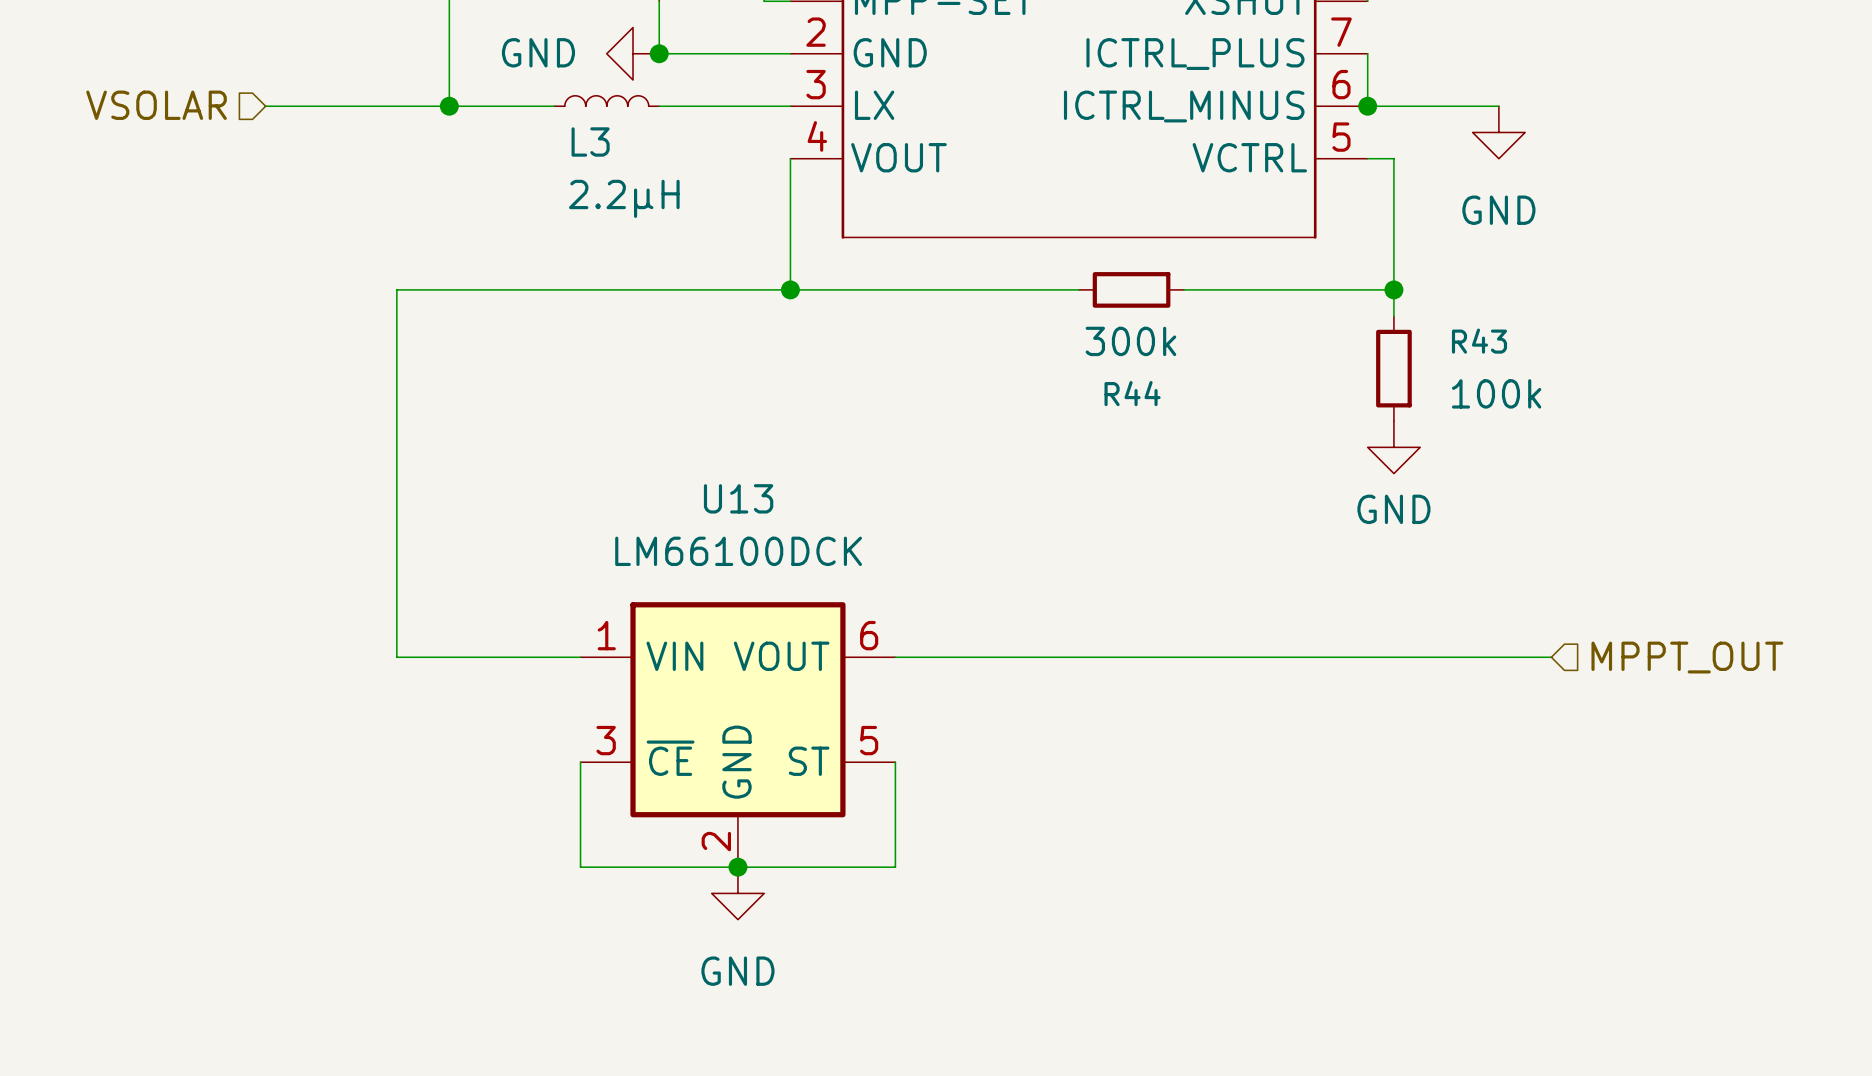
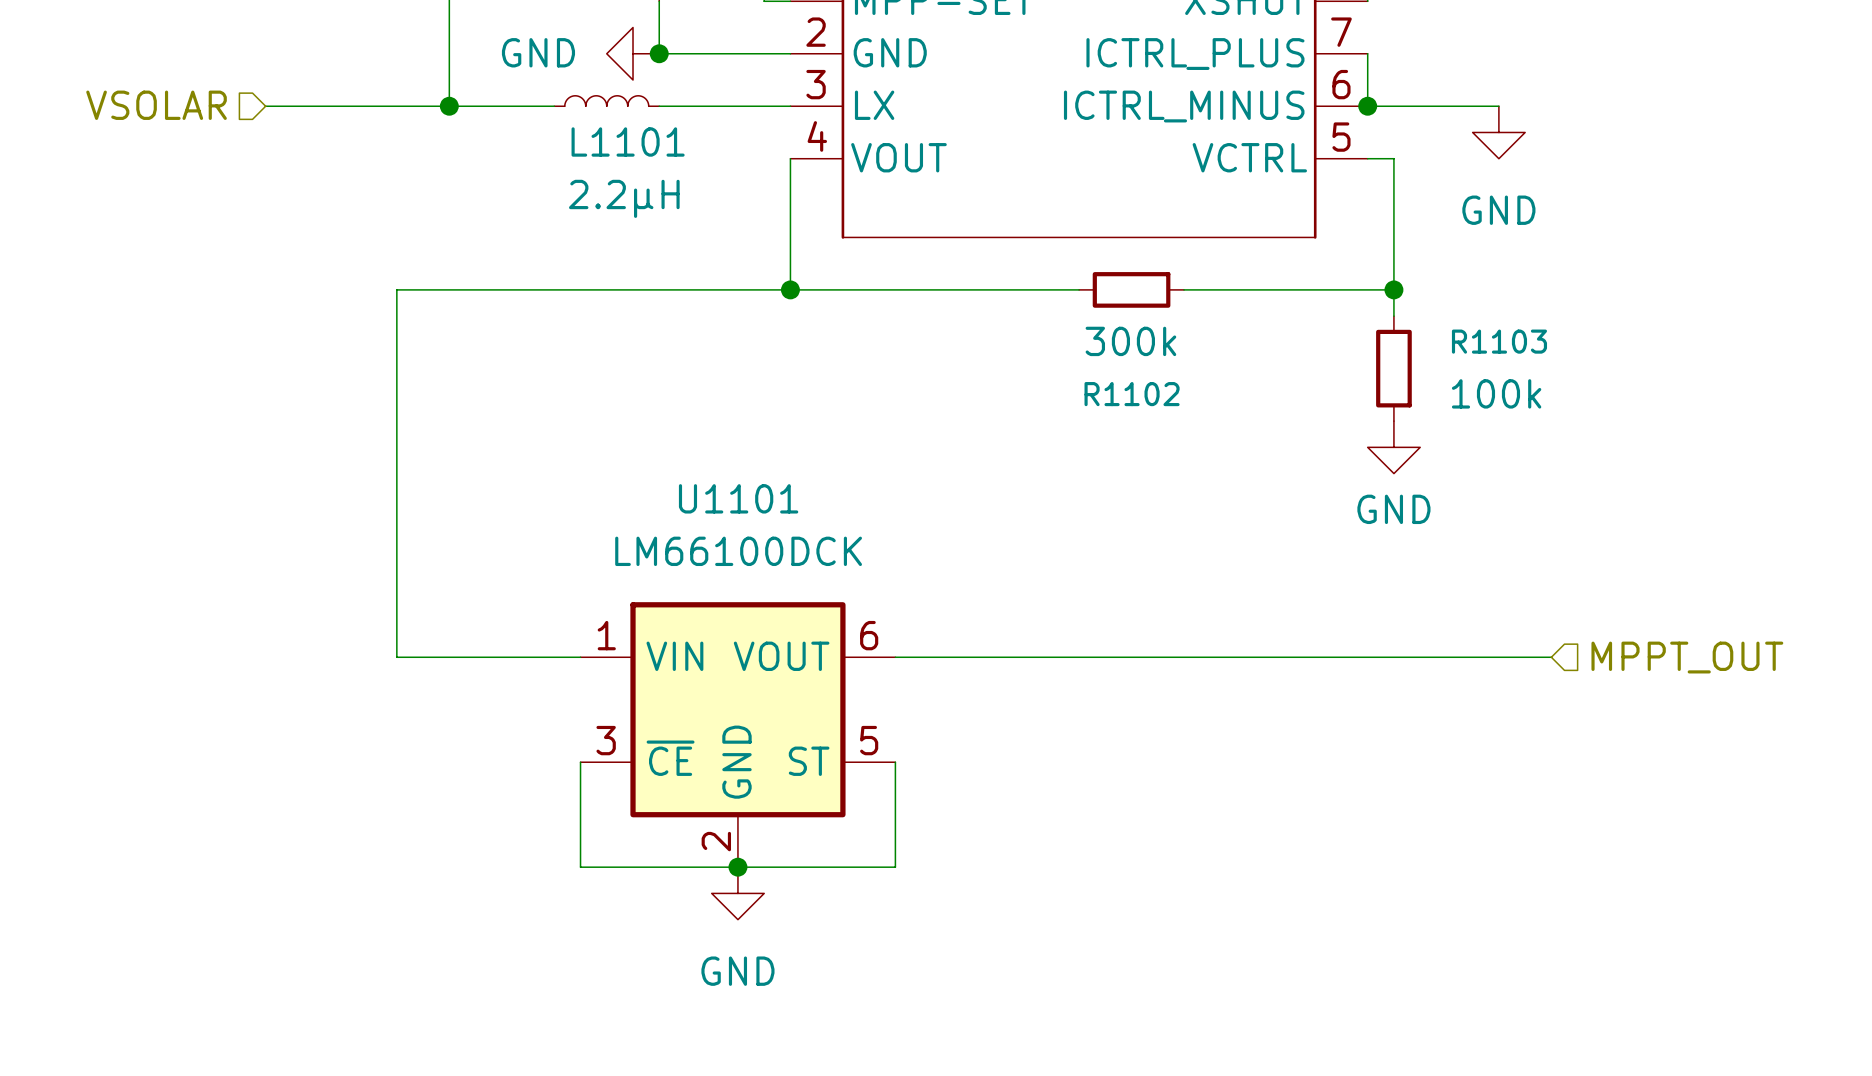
L3 name: L3 (590, 141) -> L1101 (628, 141)
R43 name: R43 (1479, 341) -> R1103 (1499, 341)
R44 name: R44 (1132, 393) -> R1102 (1132, 394)
U13 name: U13 (738, 498) -> U1101 (738, 498)

